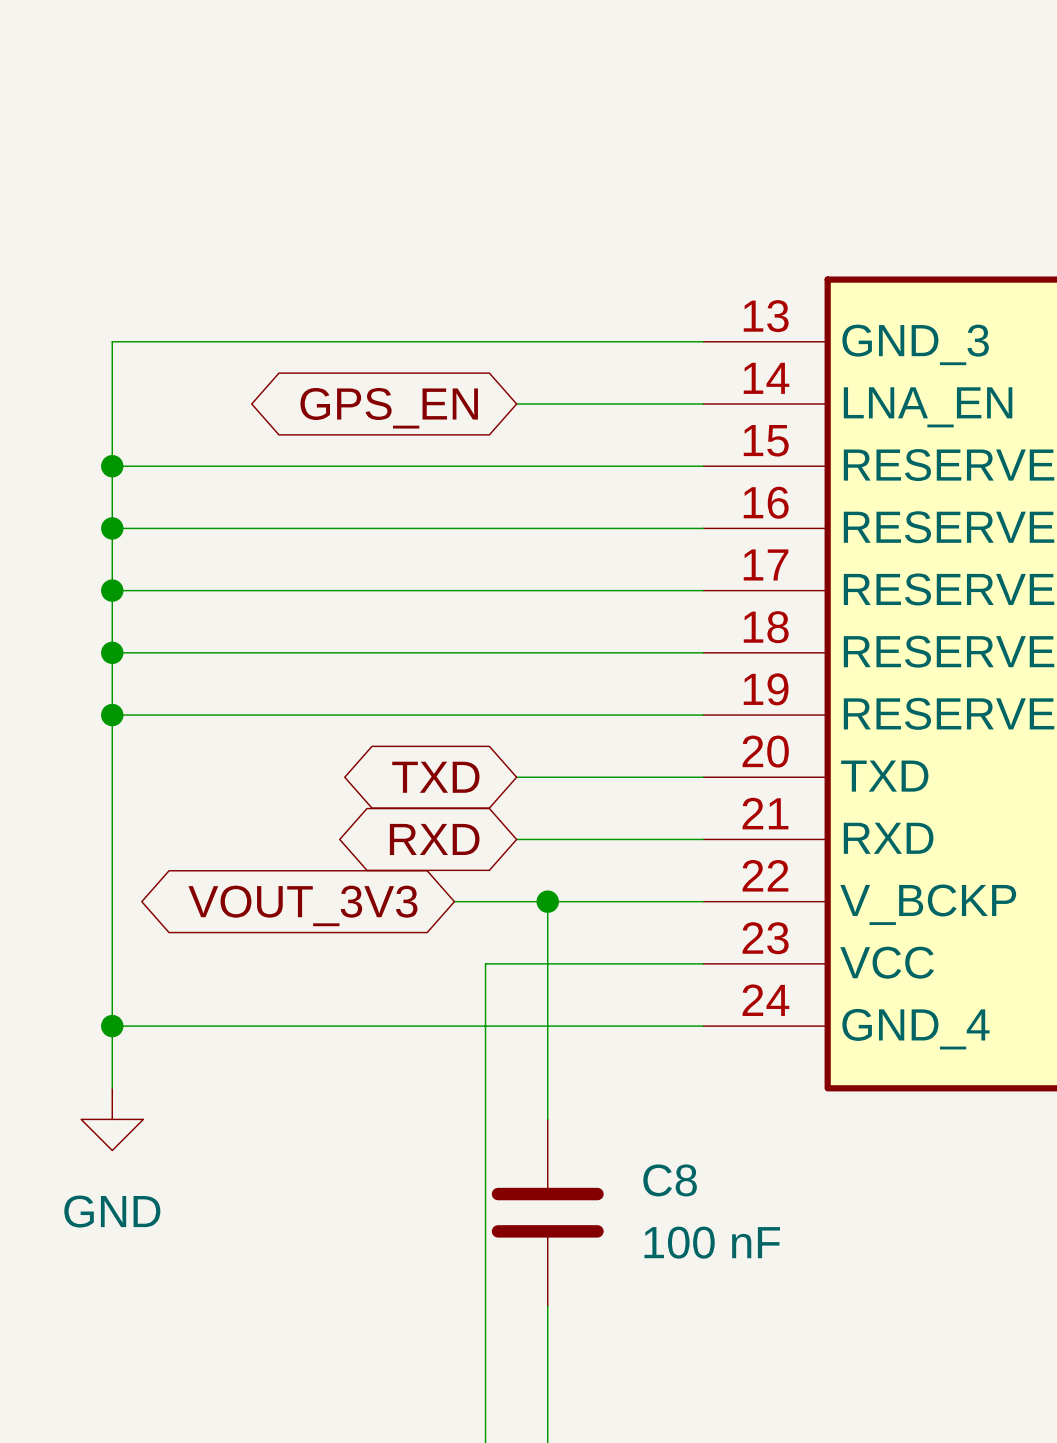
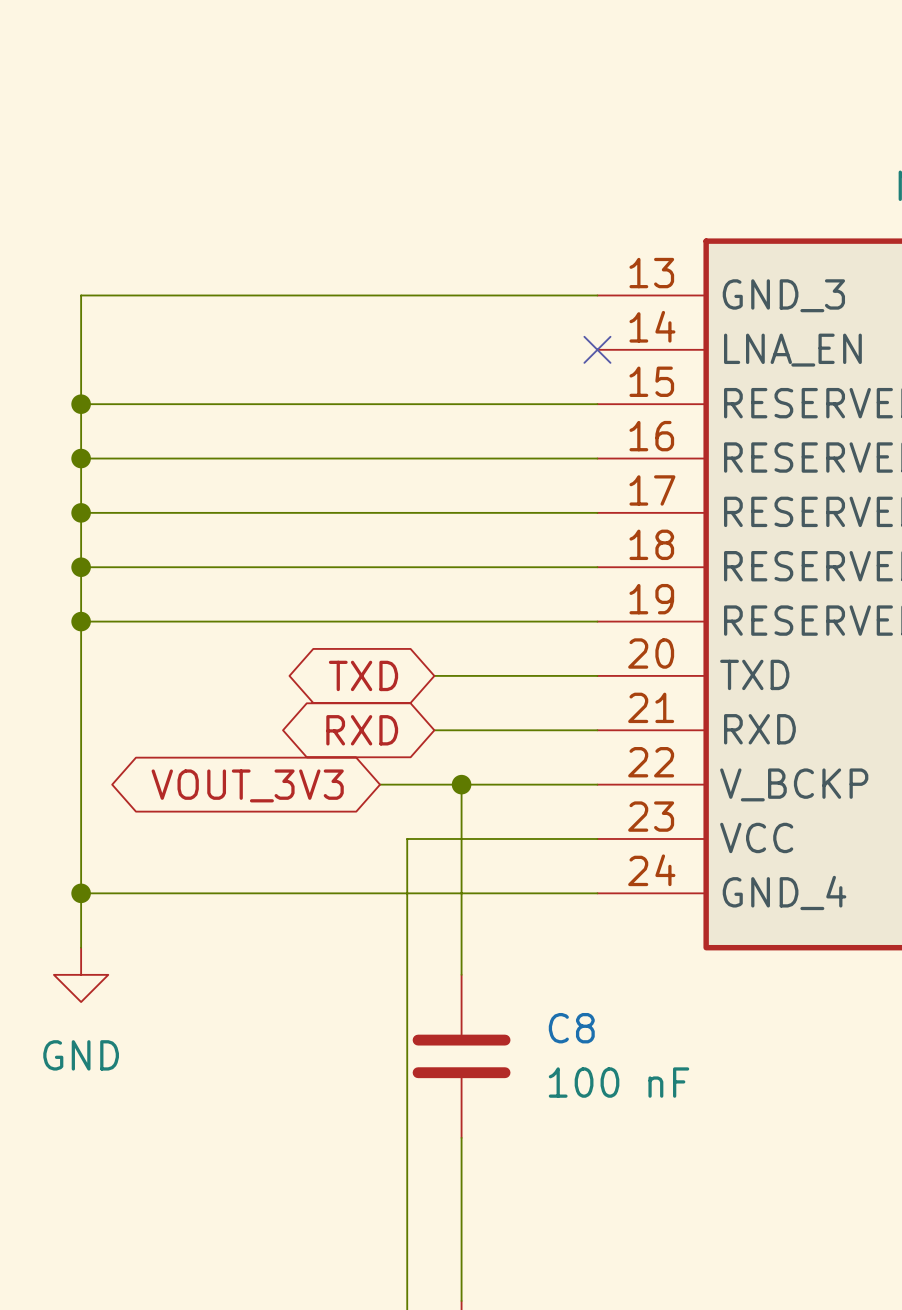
wire: (516, 404) (703, 404) -> none
no-connect mark: none -> (597, 349)
global label: GPS_EN (389, 408) -> none

